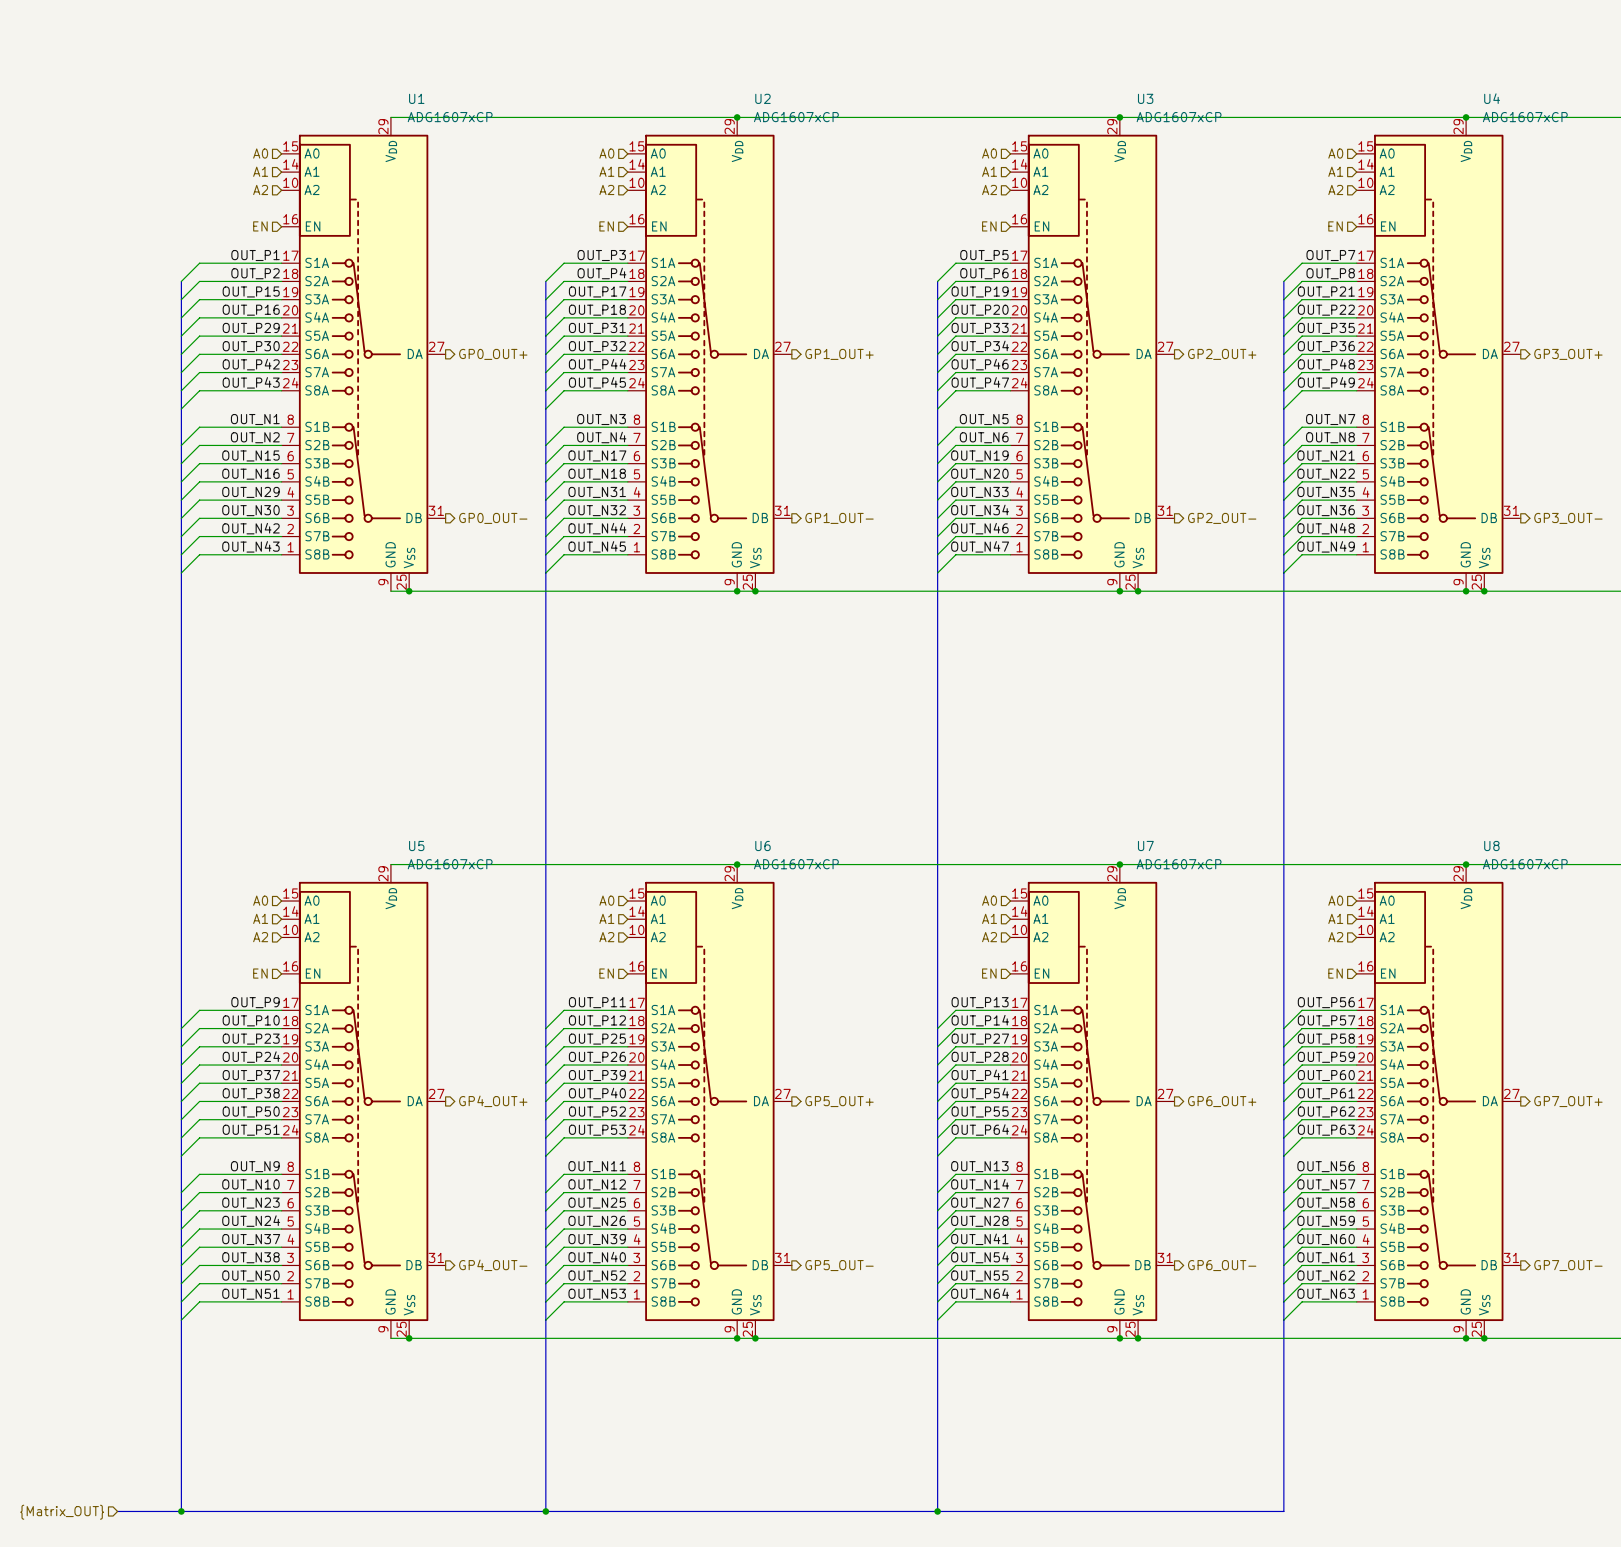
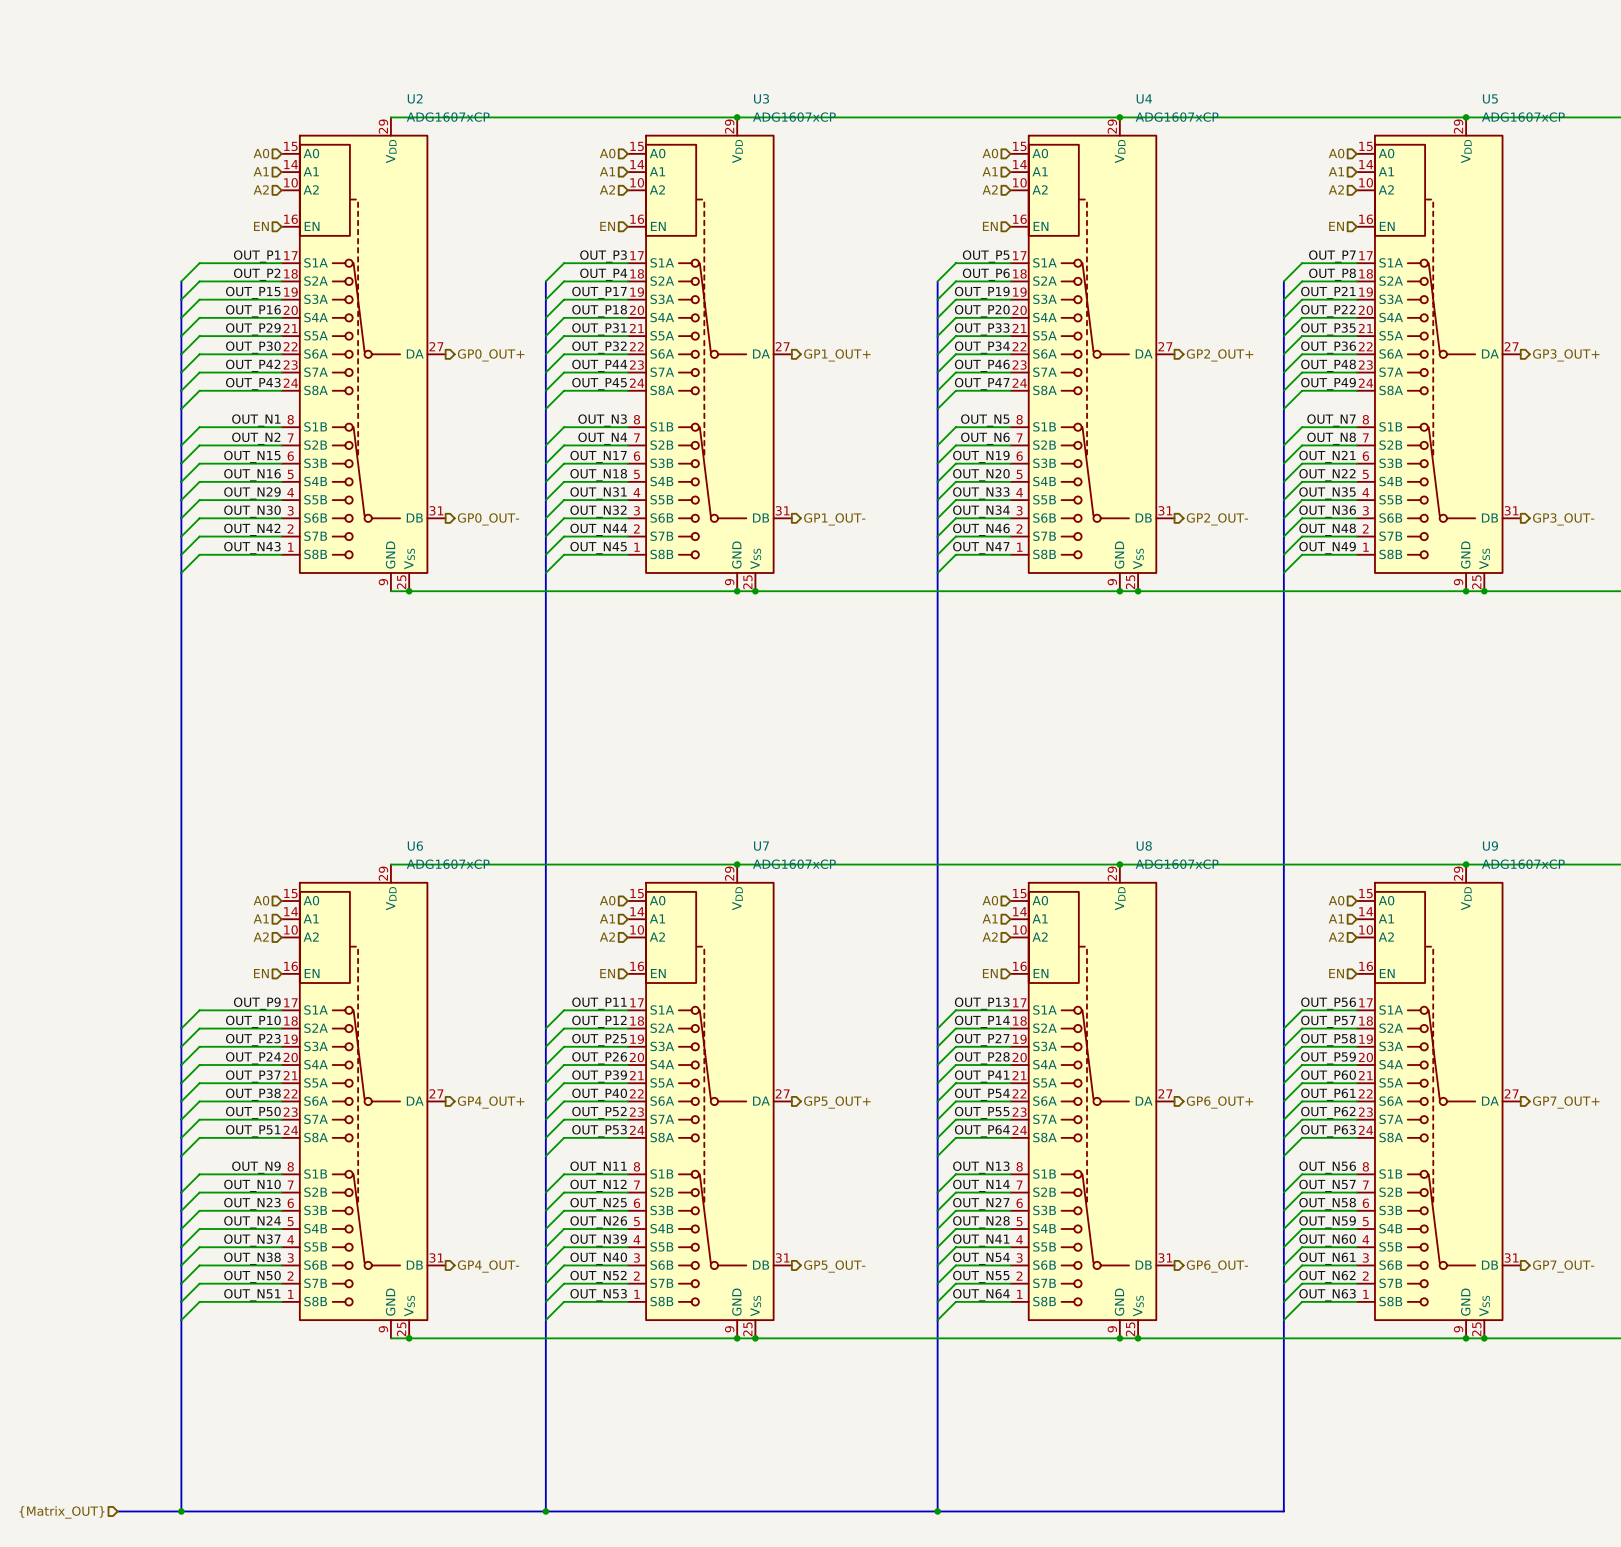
U1 name: U1 (416, 98) -> U2 (415, 98)
U2 name: U2 (762, 98) -> U3 (761, 98)
U3 name: U3 (1145, 98) -> U4 (1144, 98)
U4 name: U4 (1492, 98) -> U5 (1490, 98)
U5 name: U5 (416, 845) -> U6 (415, 846)
U6 name: U6 (762, 845) -> U7 (761, 846)
U7 name: U7 (1145, 845) -> U8 (1144, 846)
U8 name: U8 (1491, 845) -> U9 (1490, 846)

